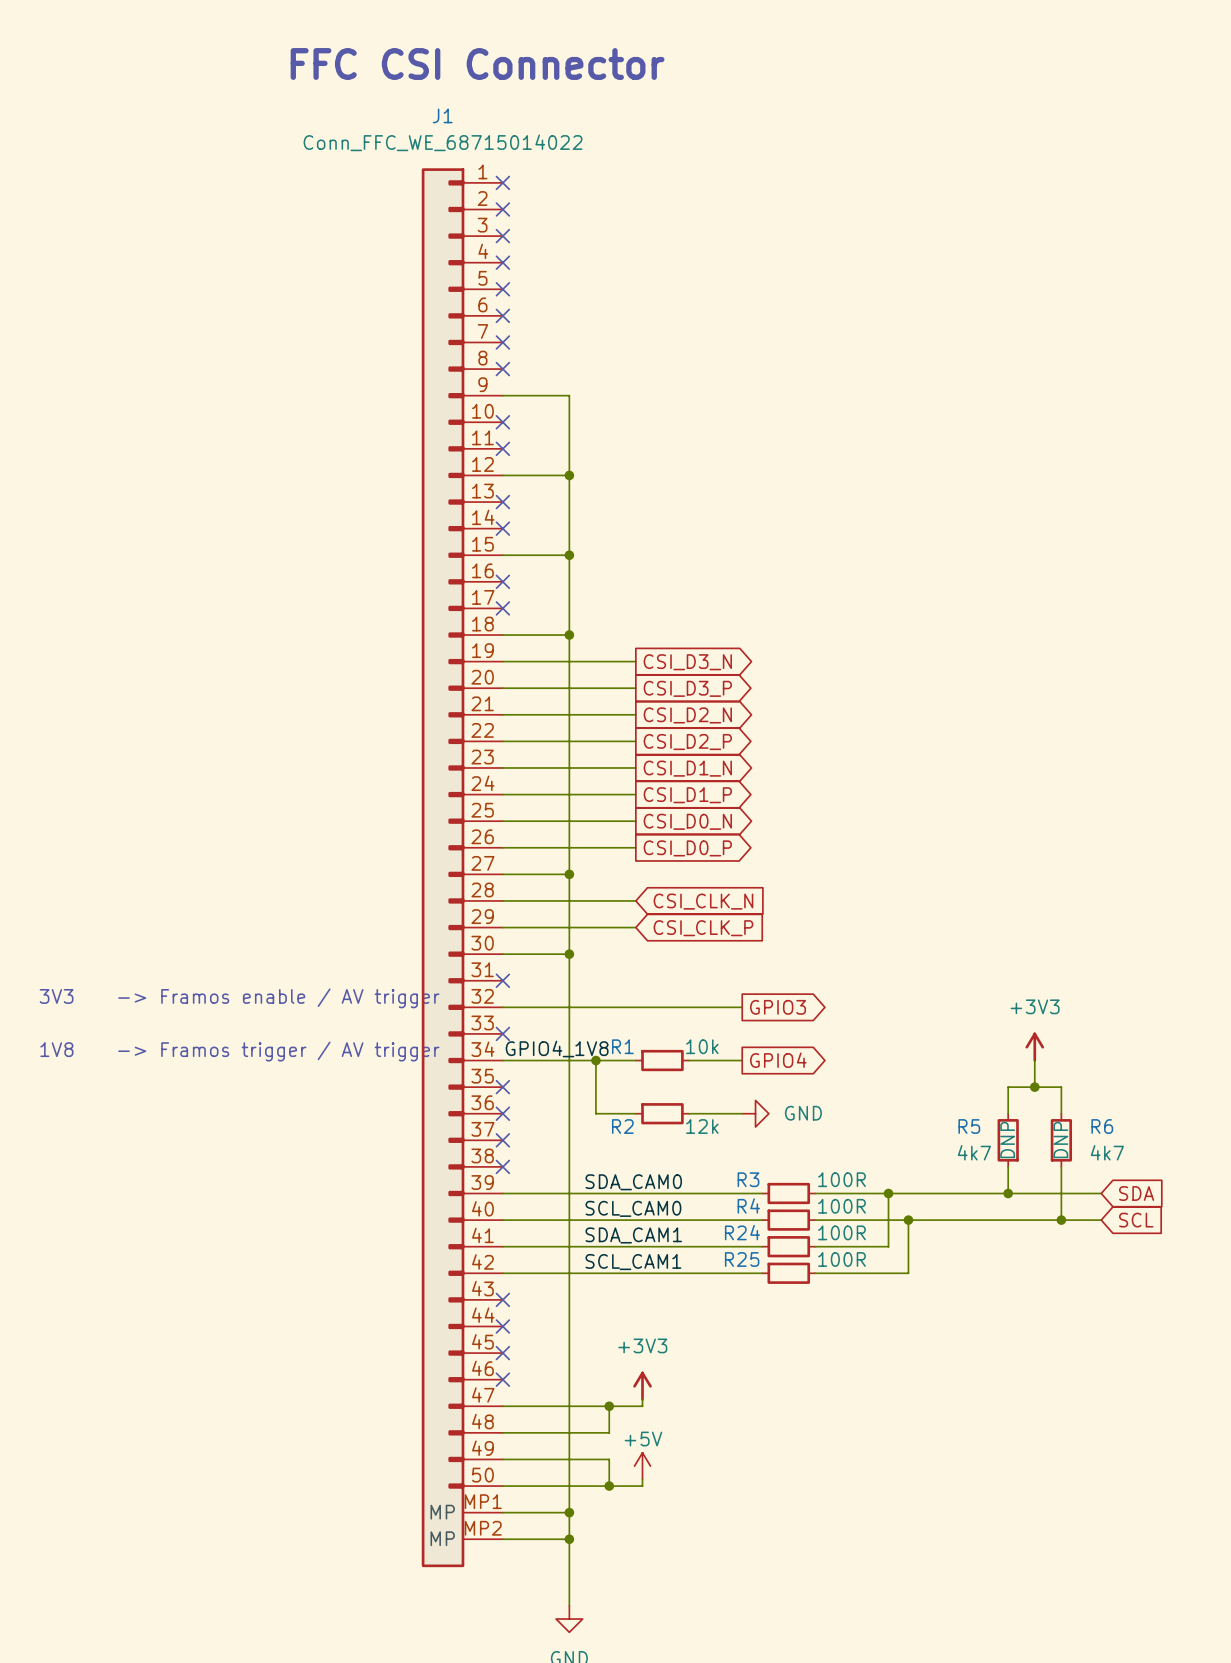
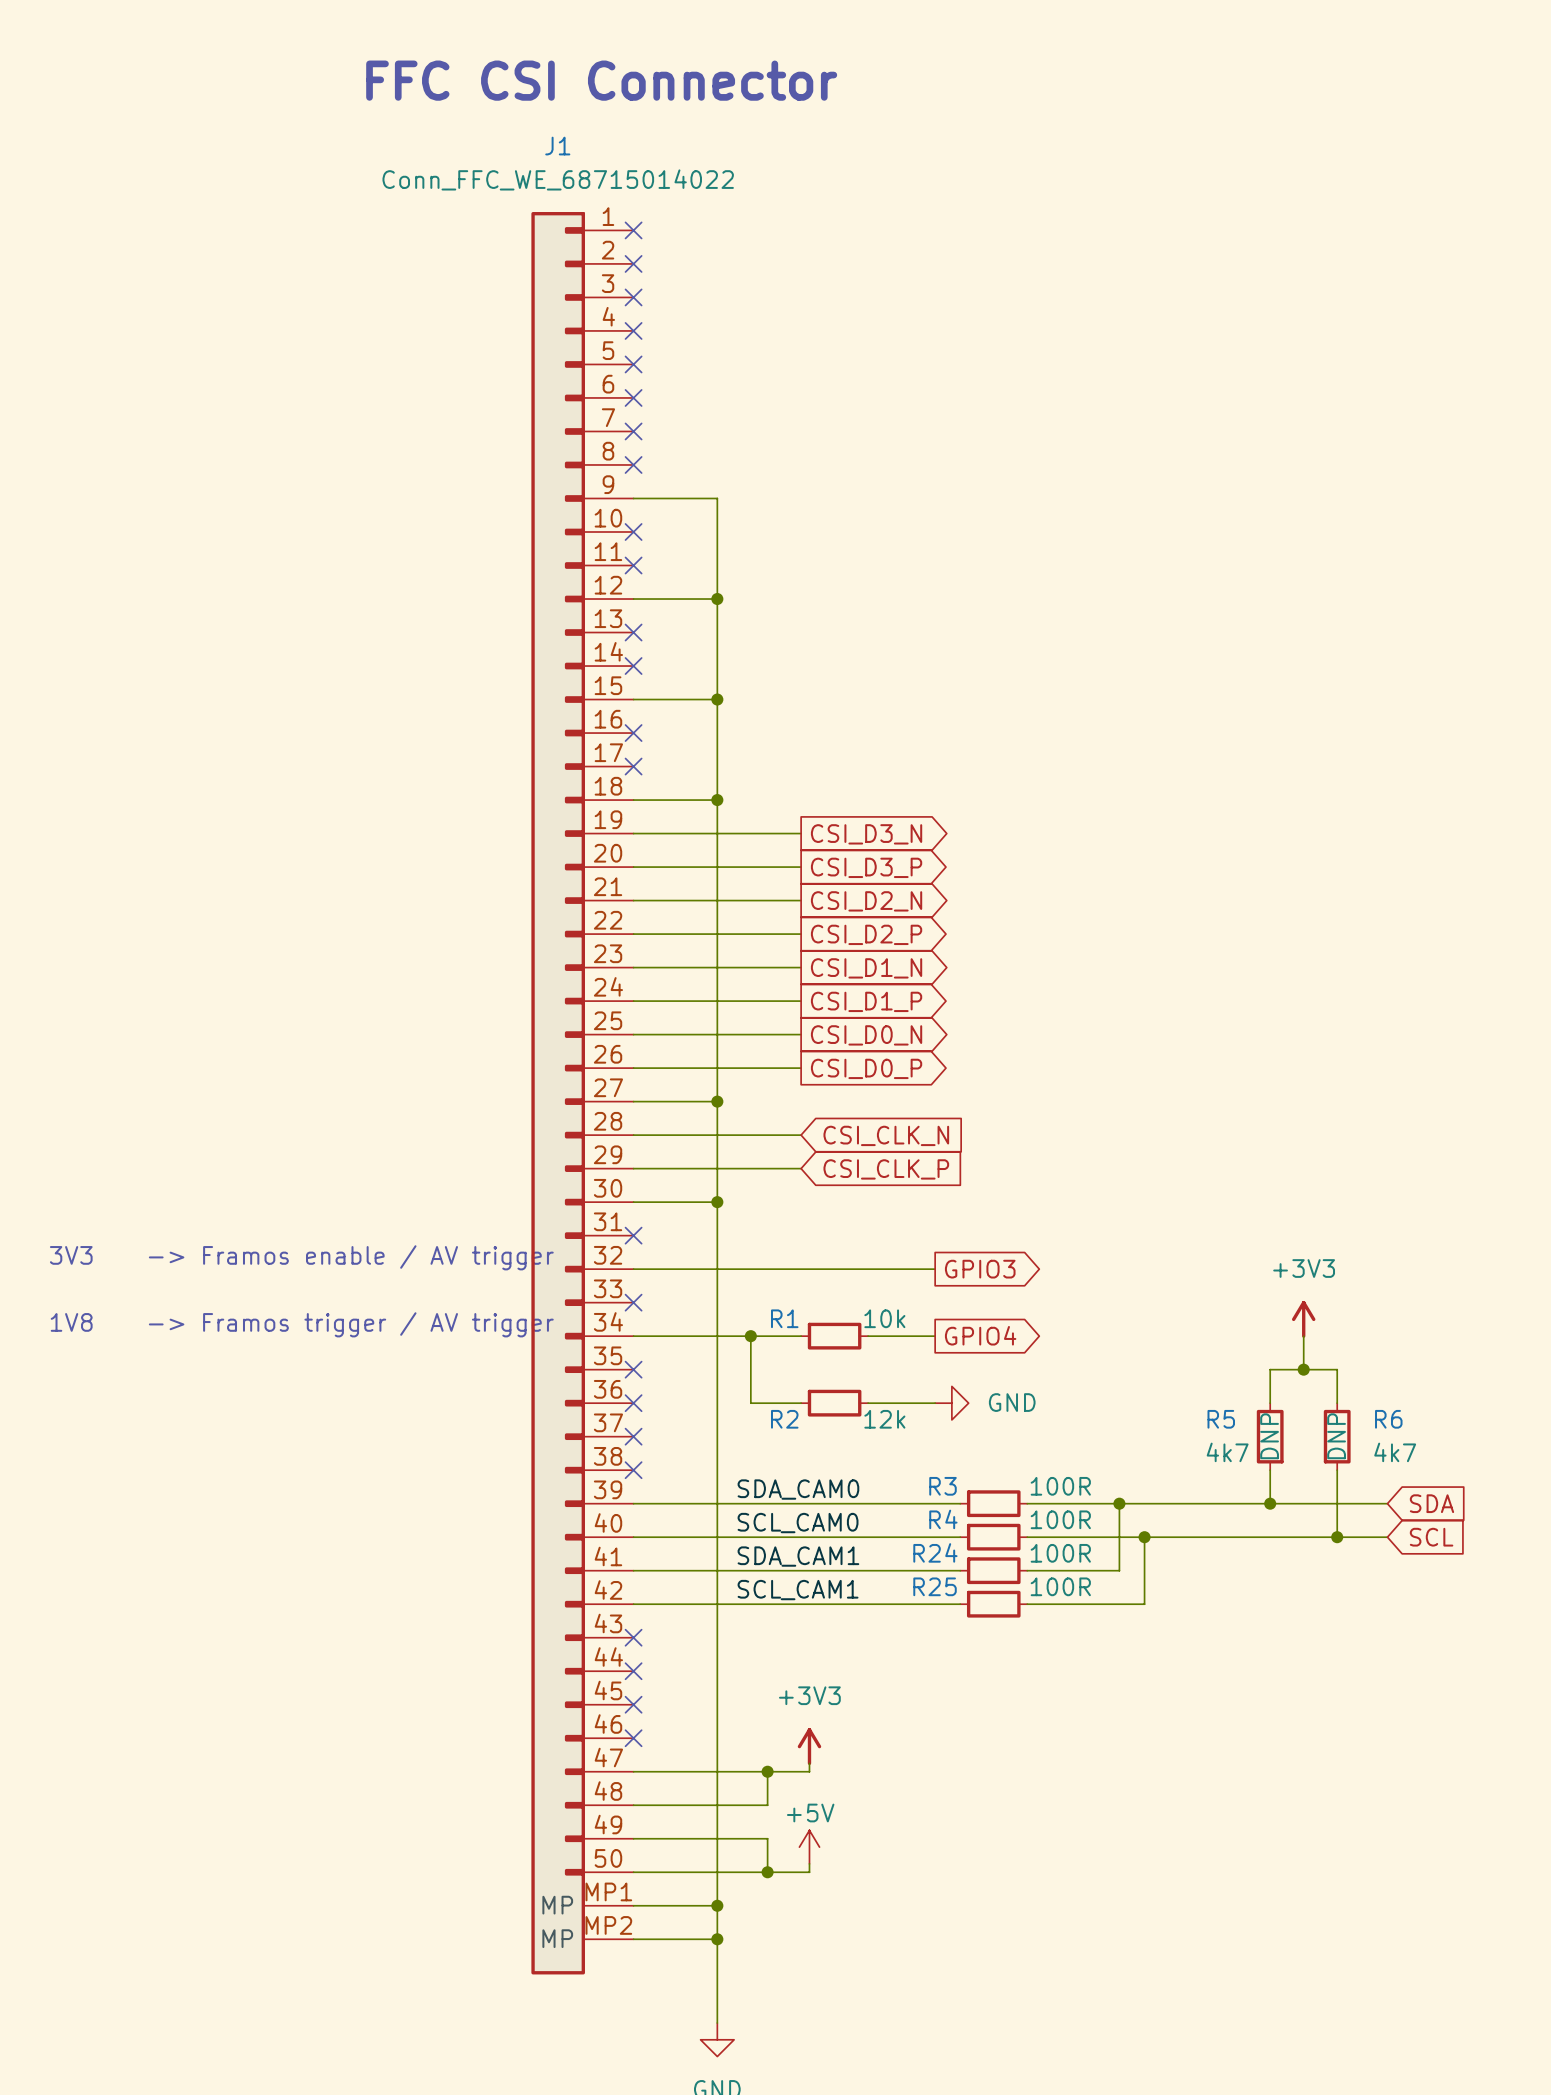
label: GPIO4_1V8 (557, 1048) -> none

